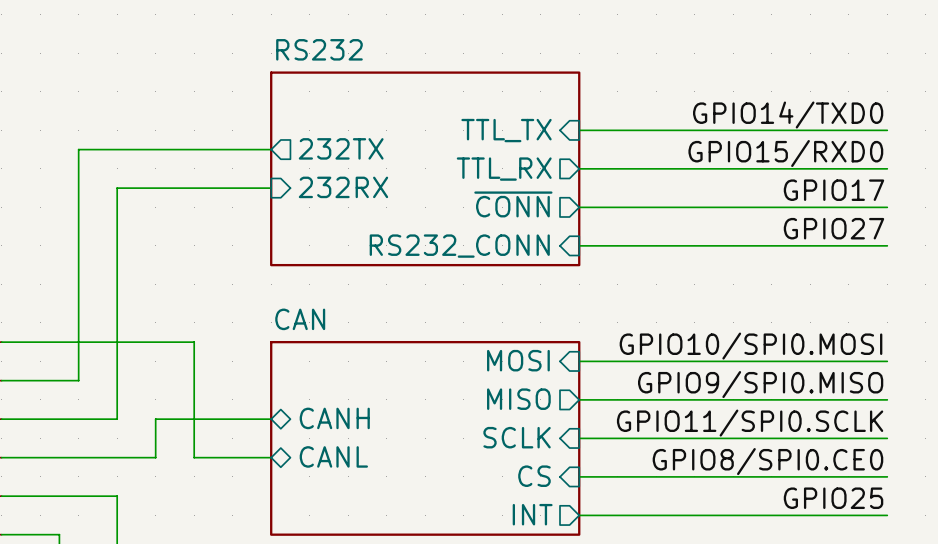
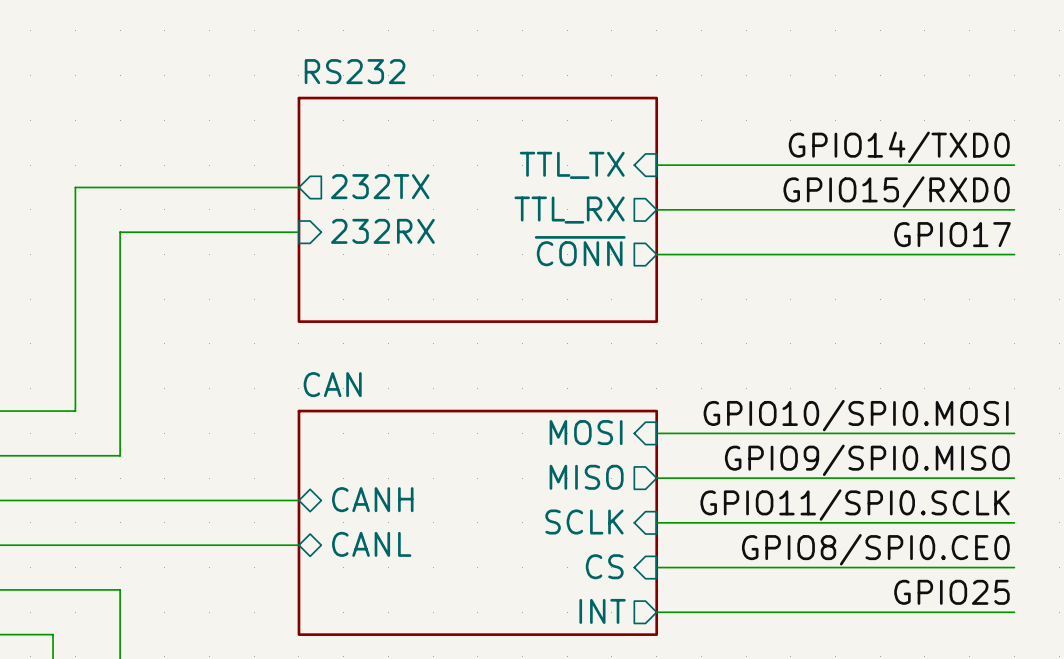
label: GPIO27 (833, 228) -> none
wire: (579, 245) (887, 245) -> none
sheet pin: RS232_CONN (459, 246) -> none
wire: (78, 380) (78, 342) (194, 342) (194, 457) -> (164, 545) (209, 545)
wire: (117, 380) (117, 419) -> (120, 455) (75, 455)
wire: (155, 419) (155, 457) -> (164, 500) (120, 500)

